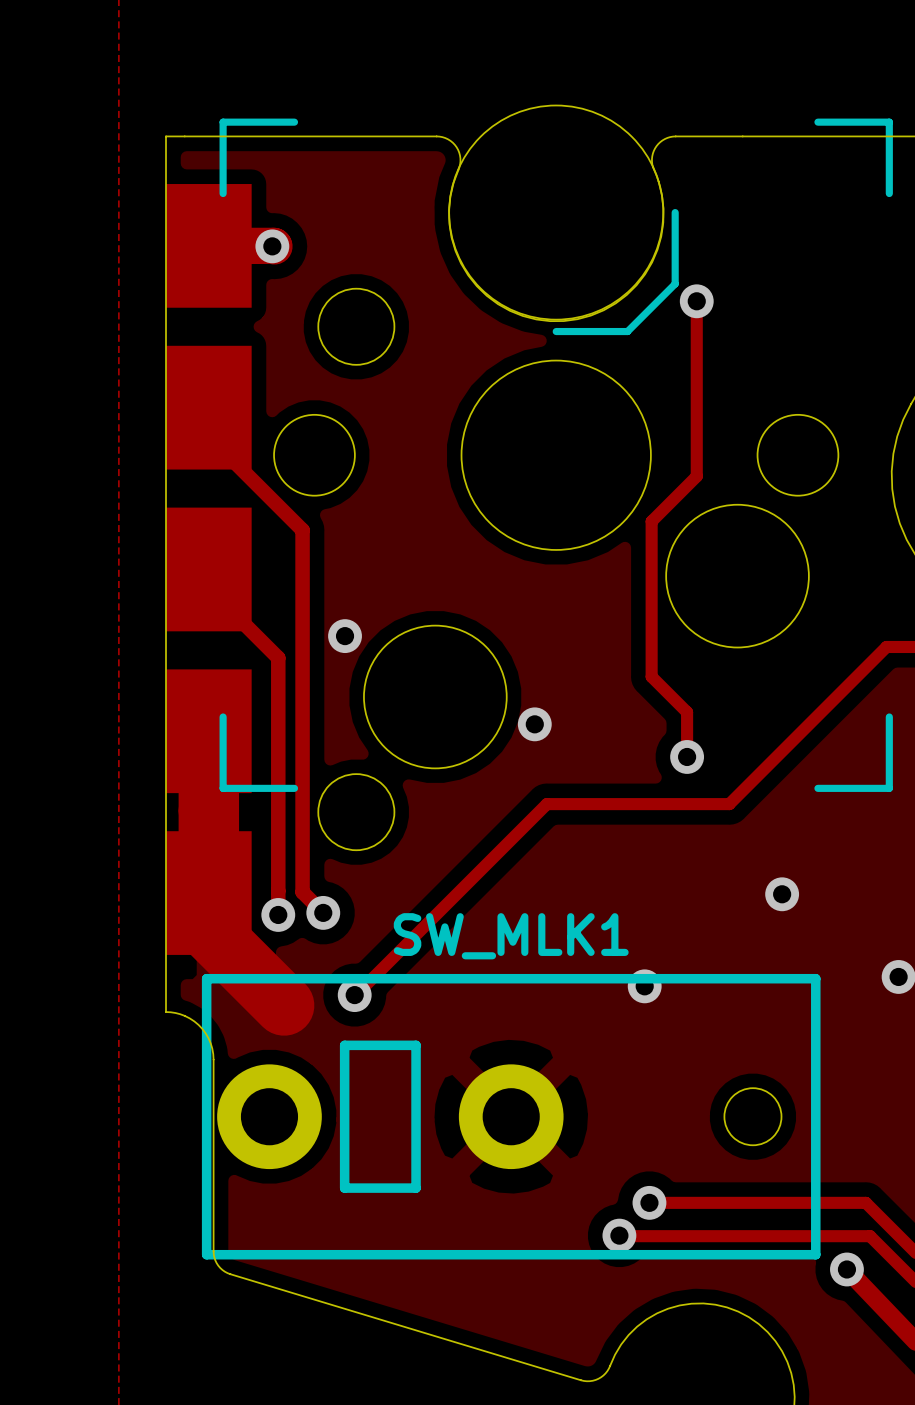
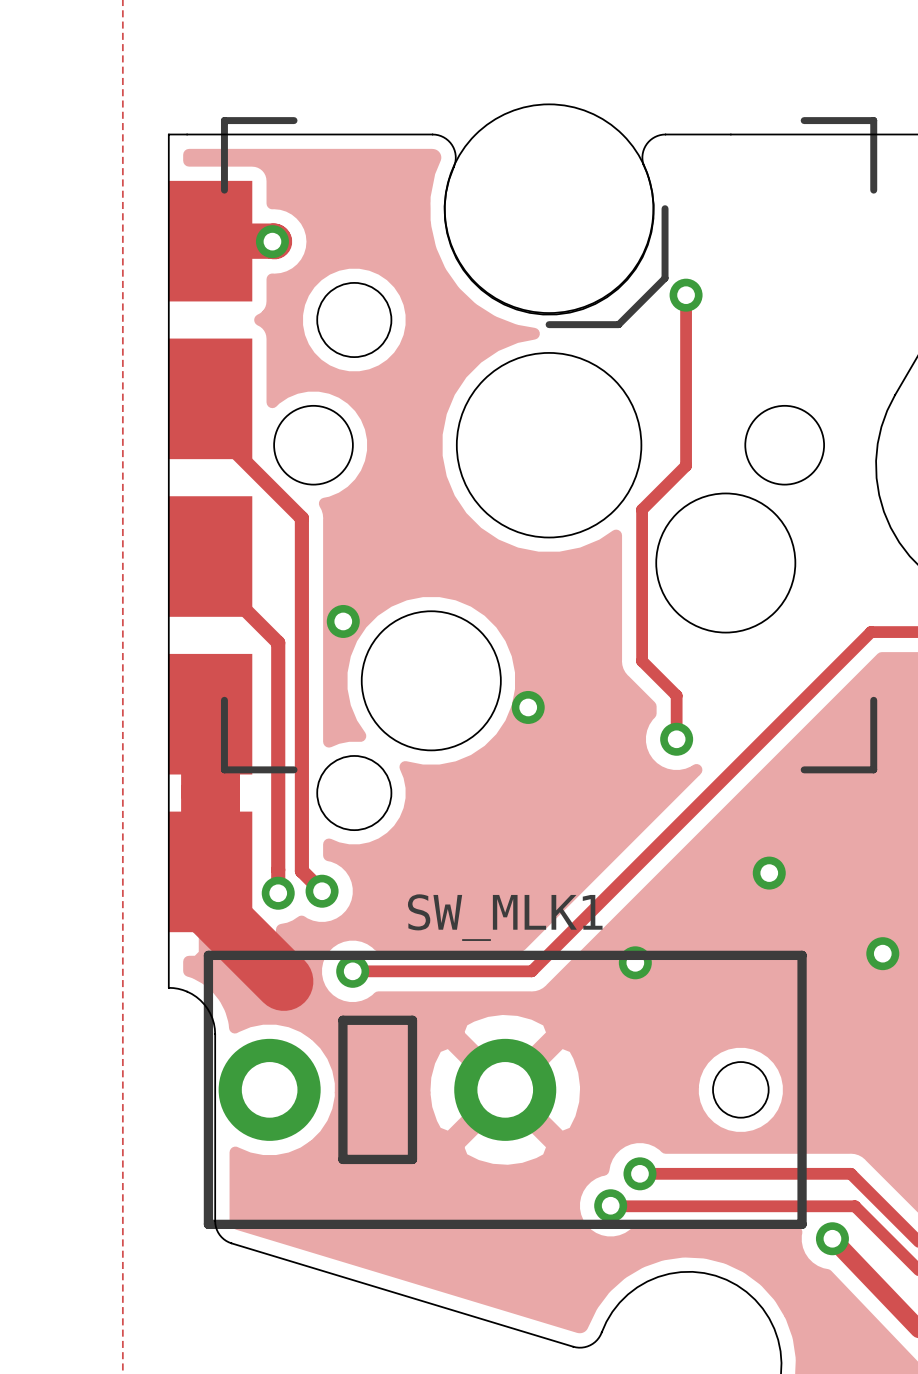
track: (729, 804) (546, 804) (355, 995) -> (717, 785) (531, 971) (353, 971)

